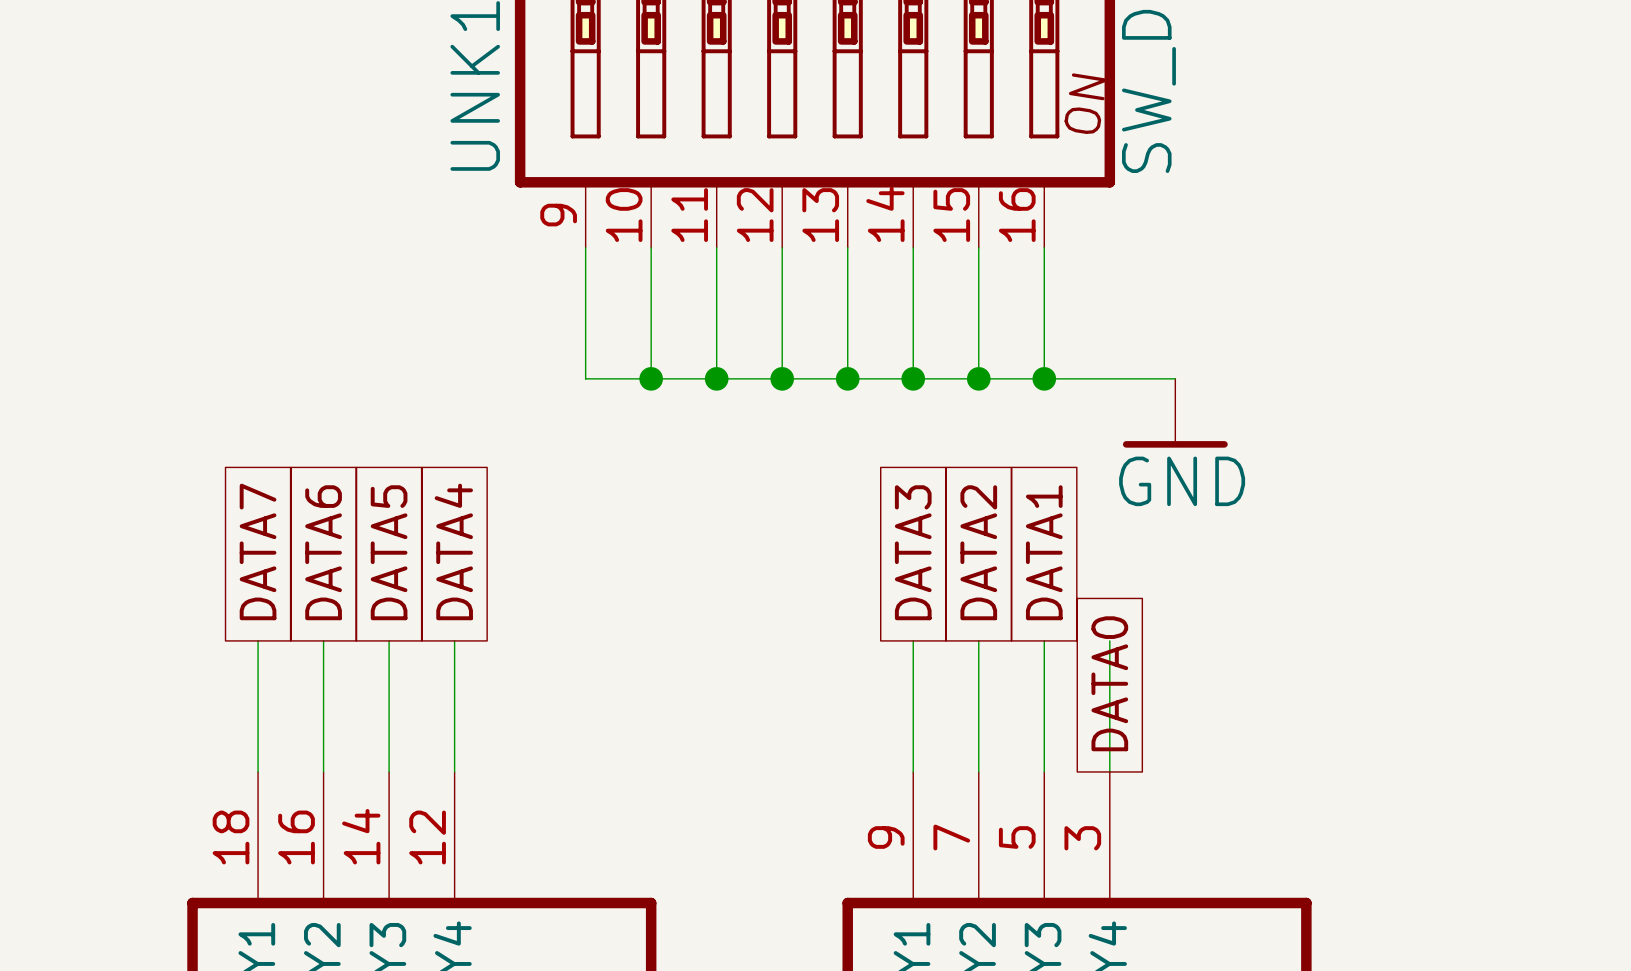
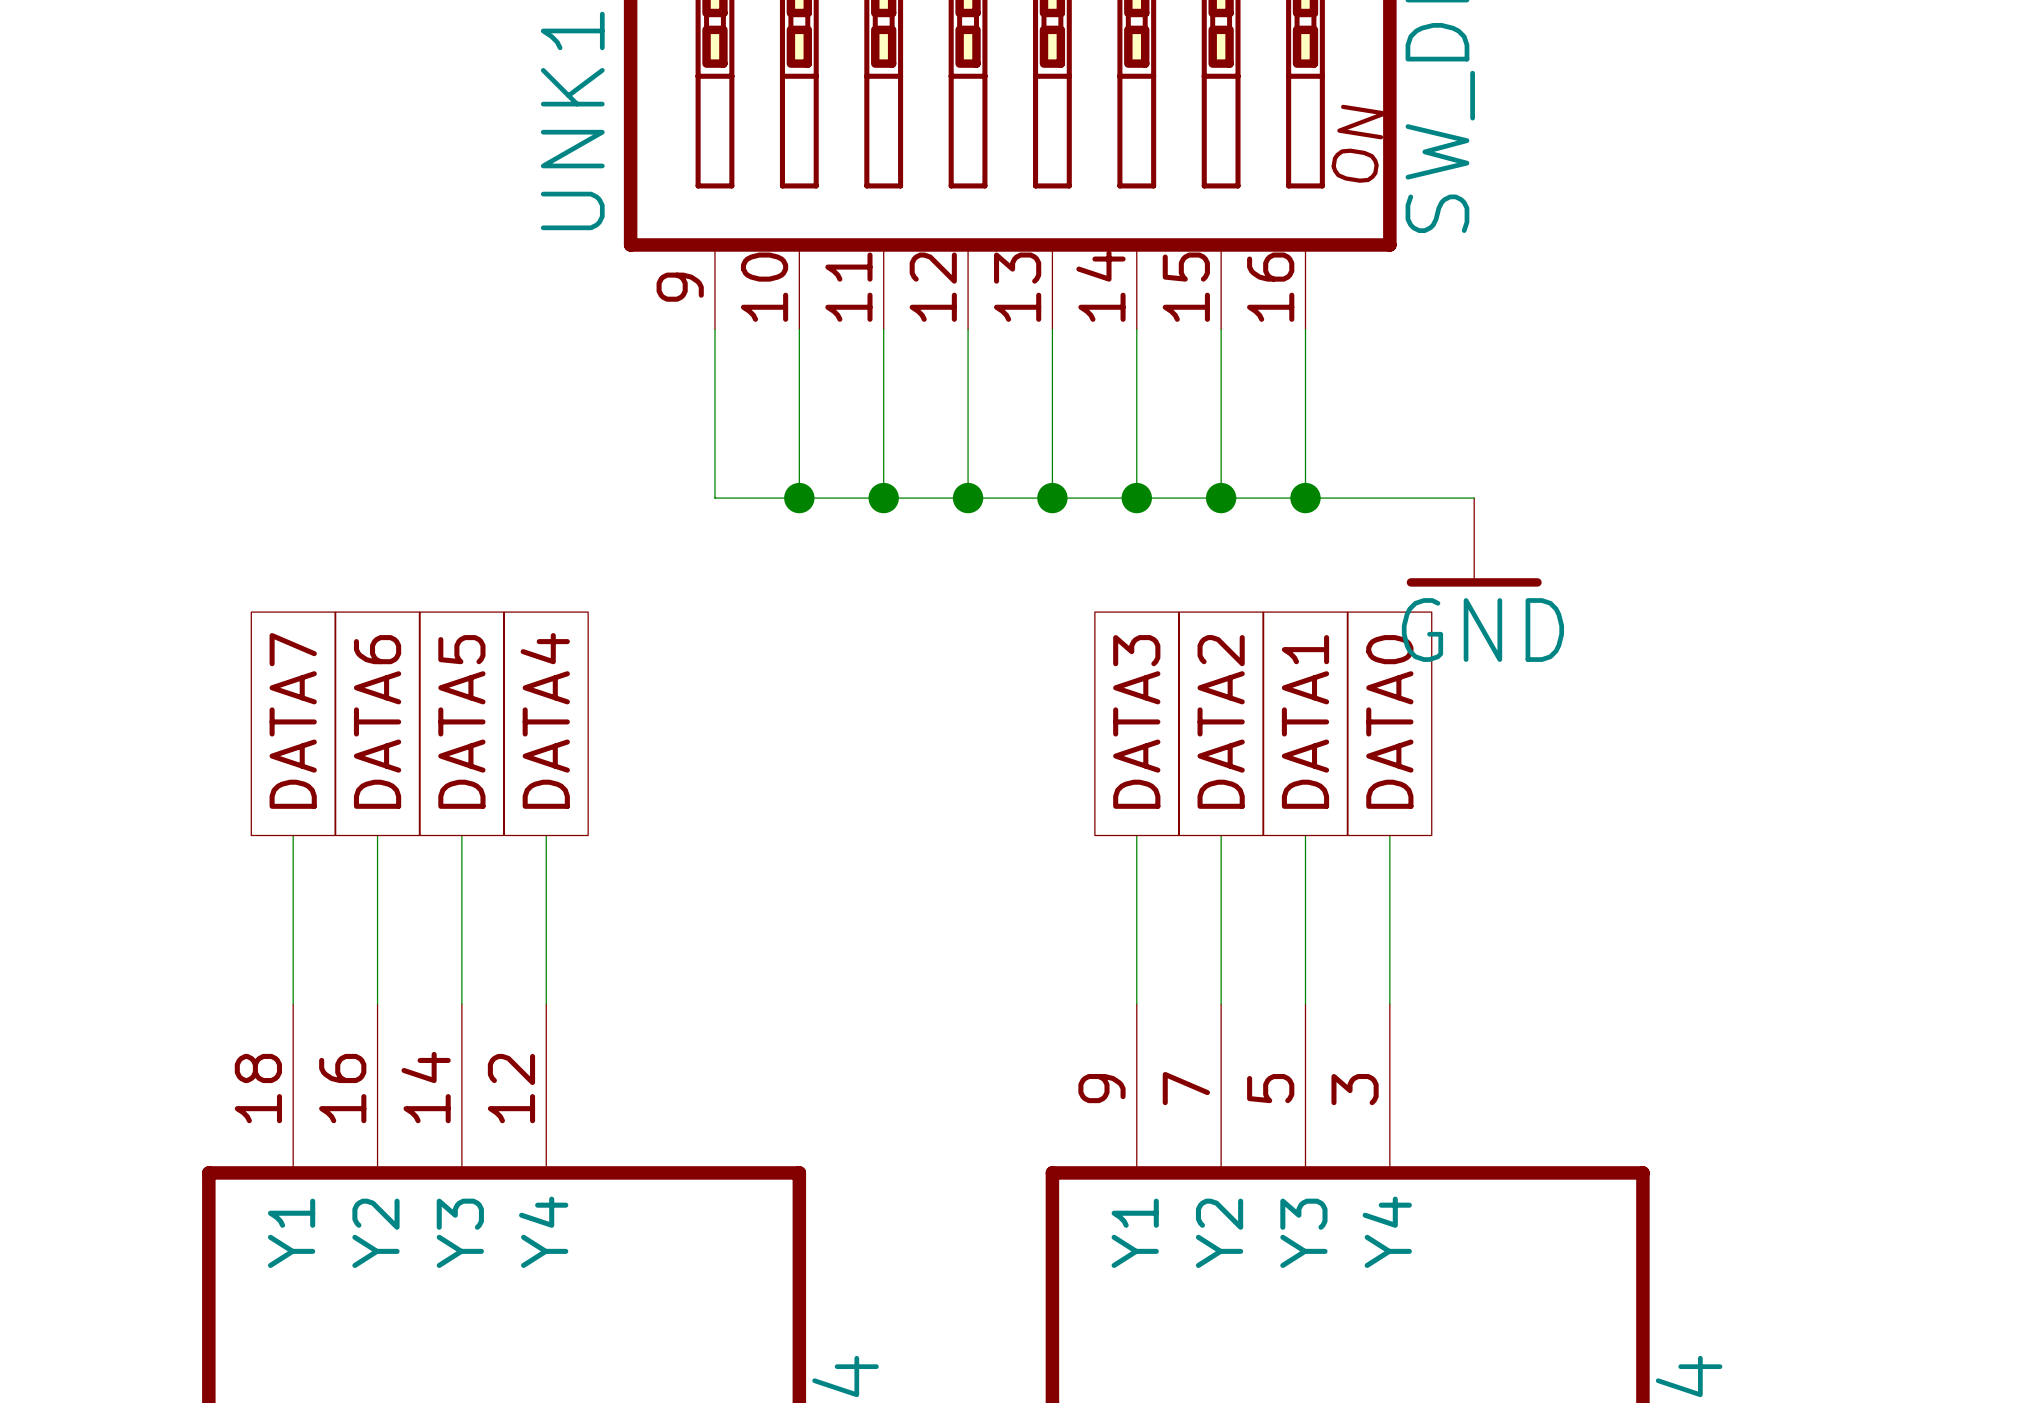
global label position: DATA0 (1109, 683) -> DATA0 (1389, 721)

